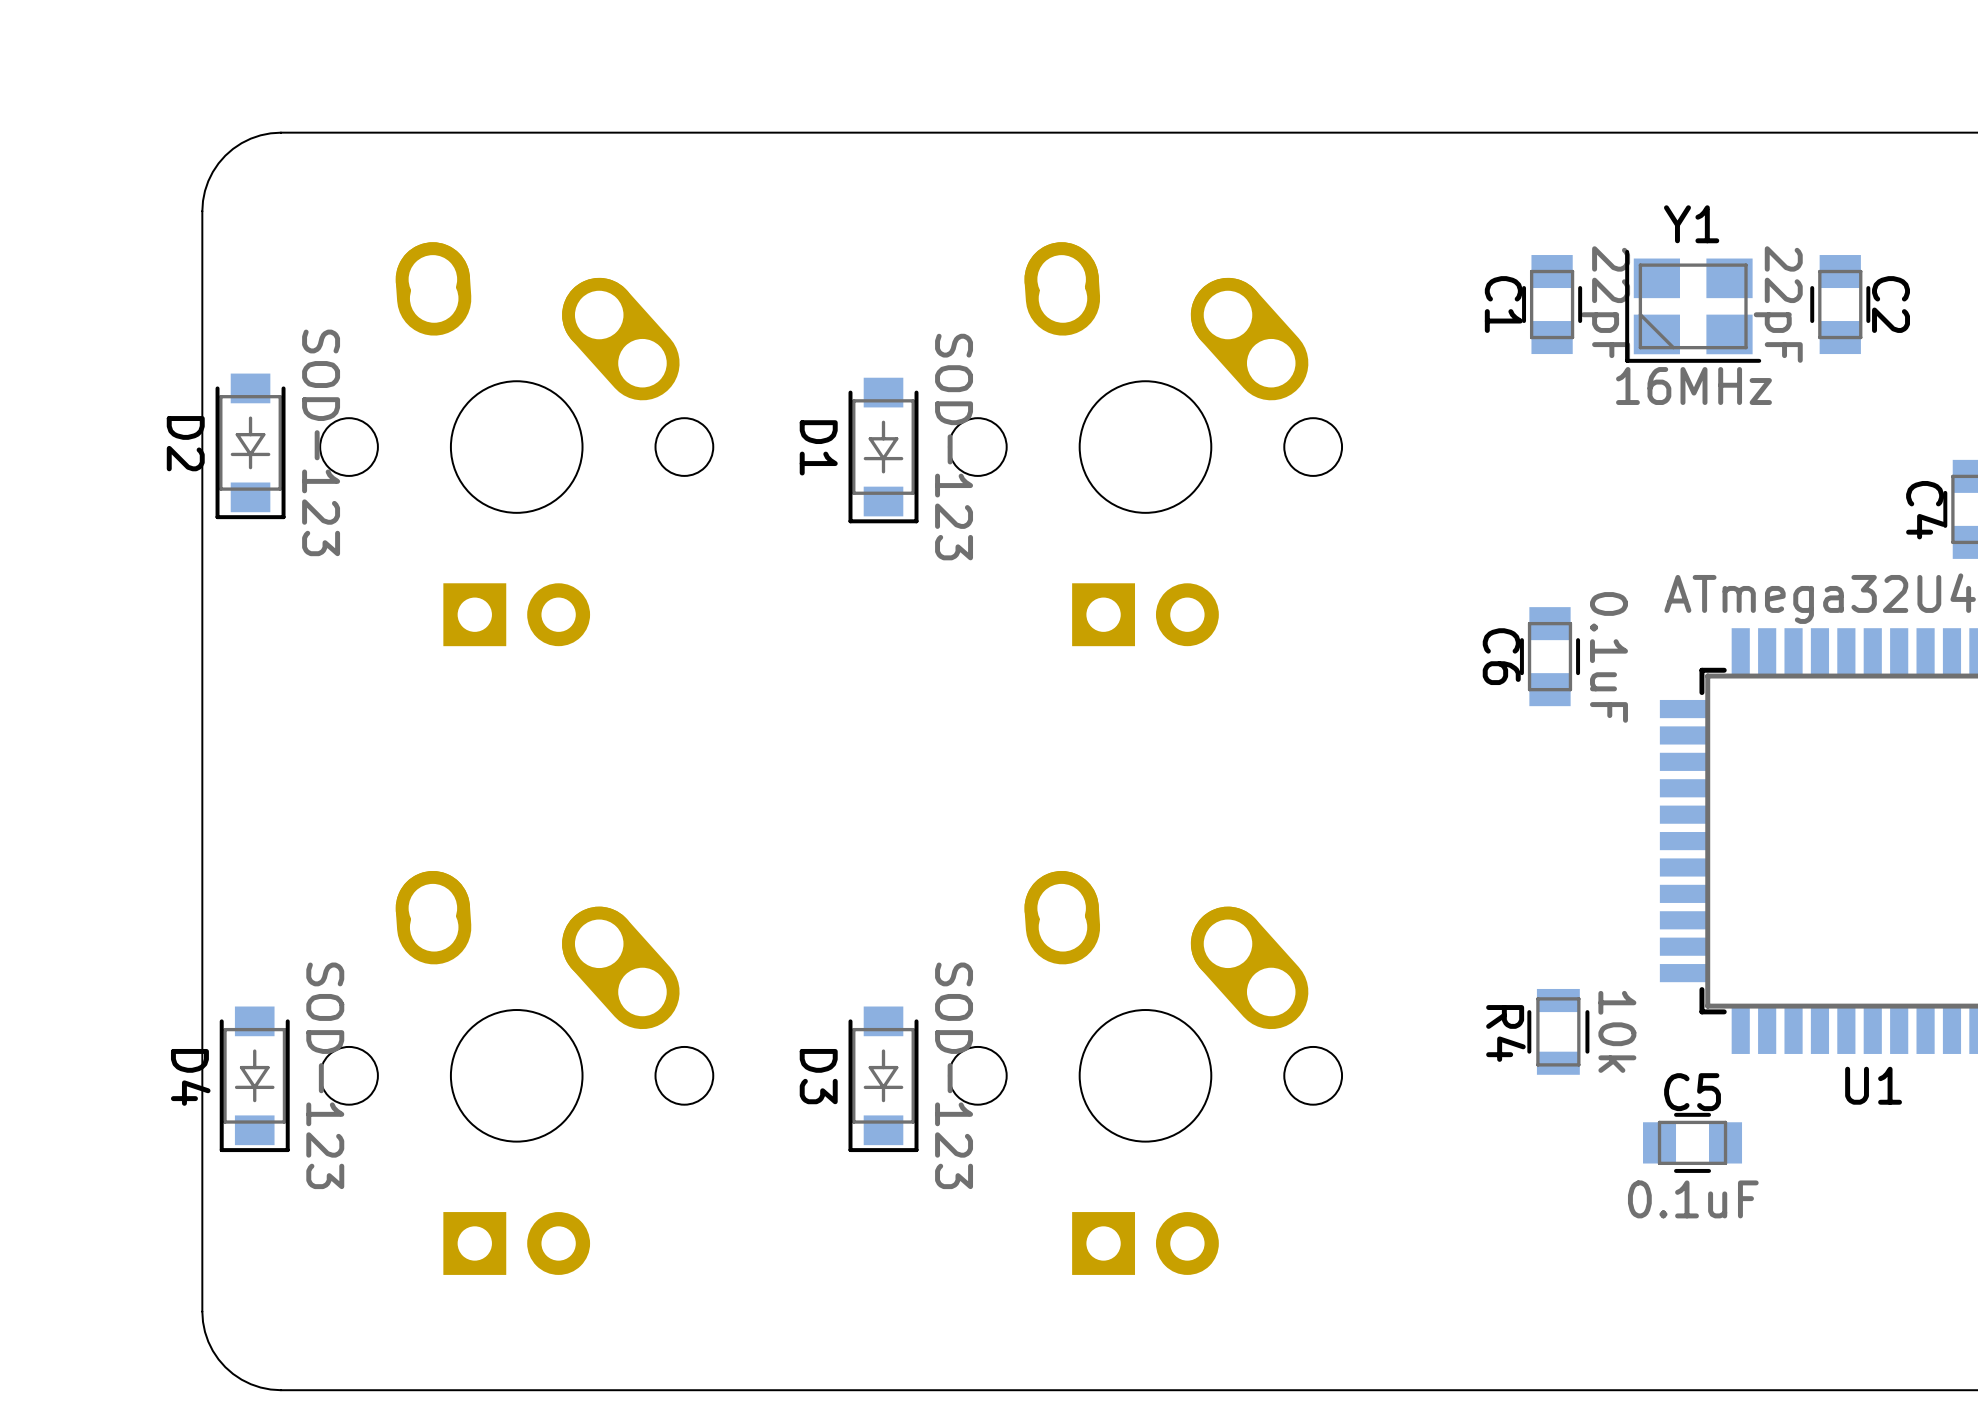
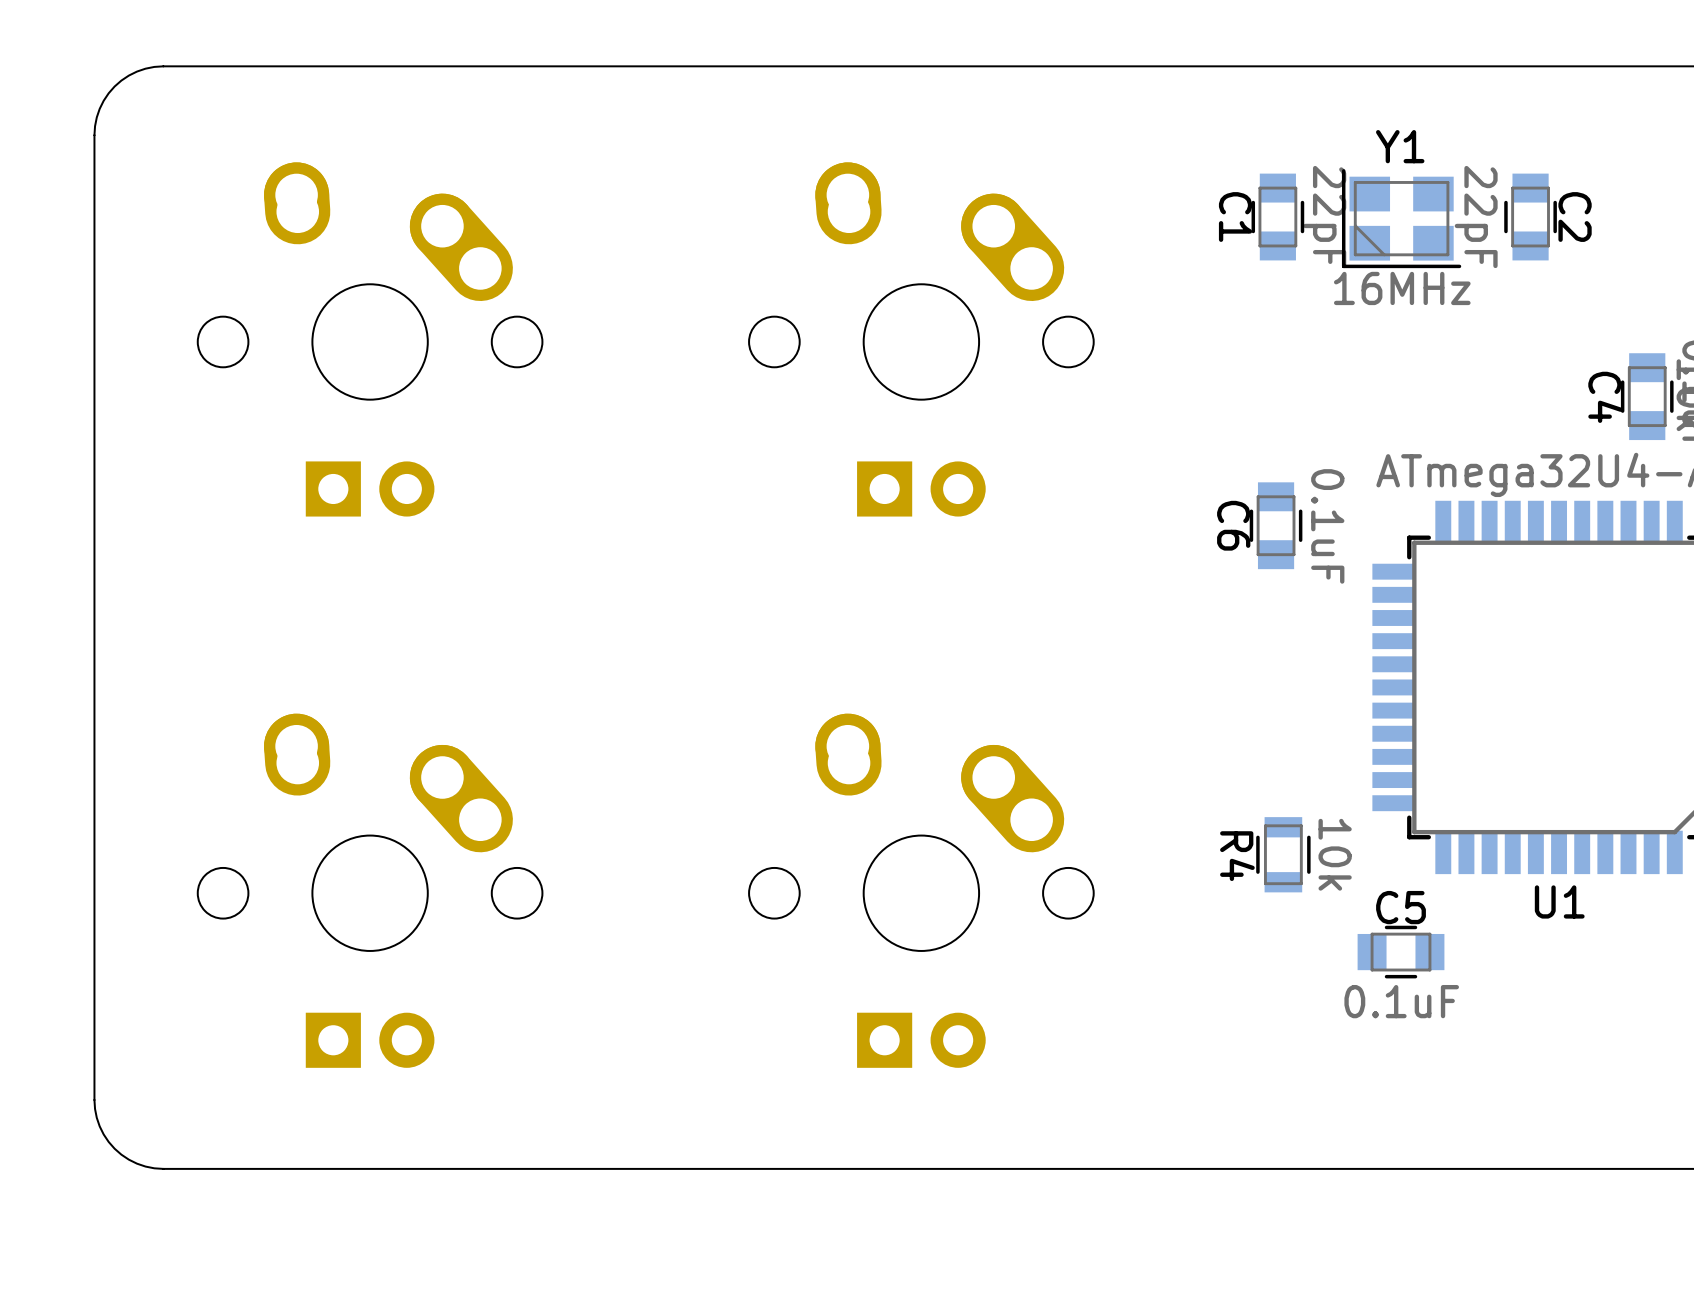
D2: SOD-123 (250, 446) -> none
D1: SOD-123 (883, 450) -> none
D4: SOD-123 (254, 1079) -> none
D3: SOD-123 (883, 1079) -> none

